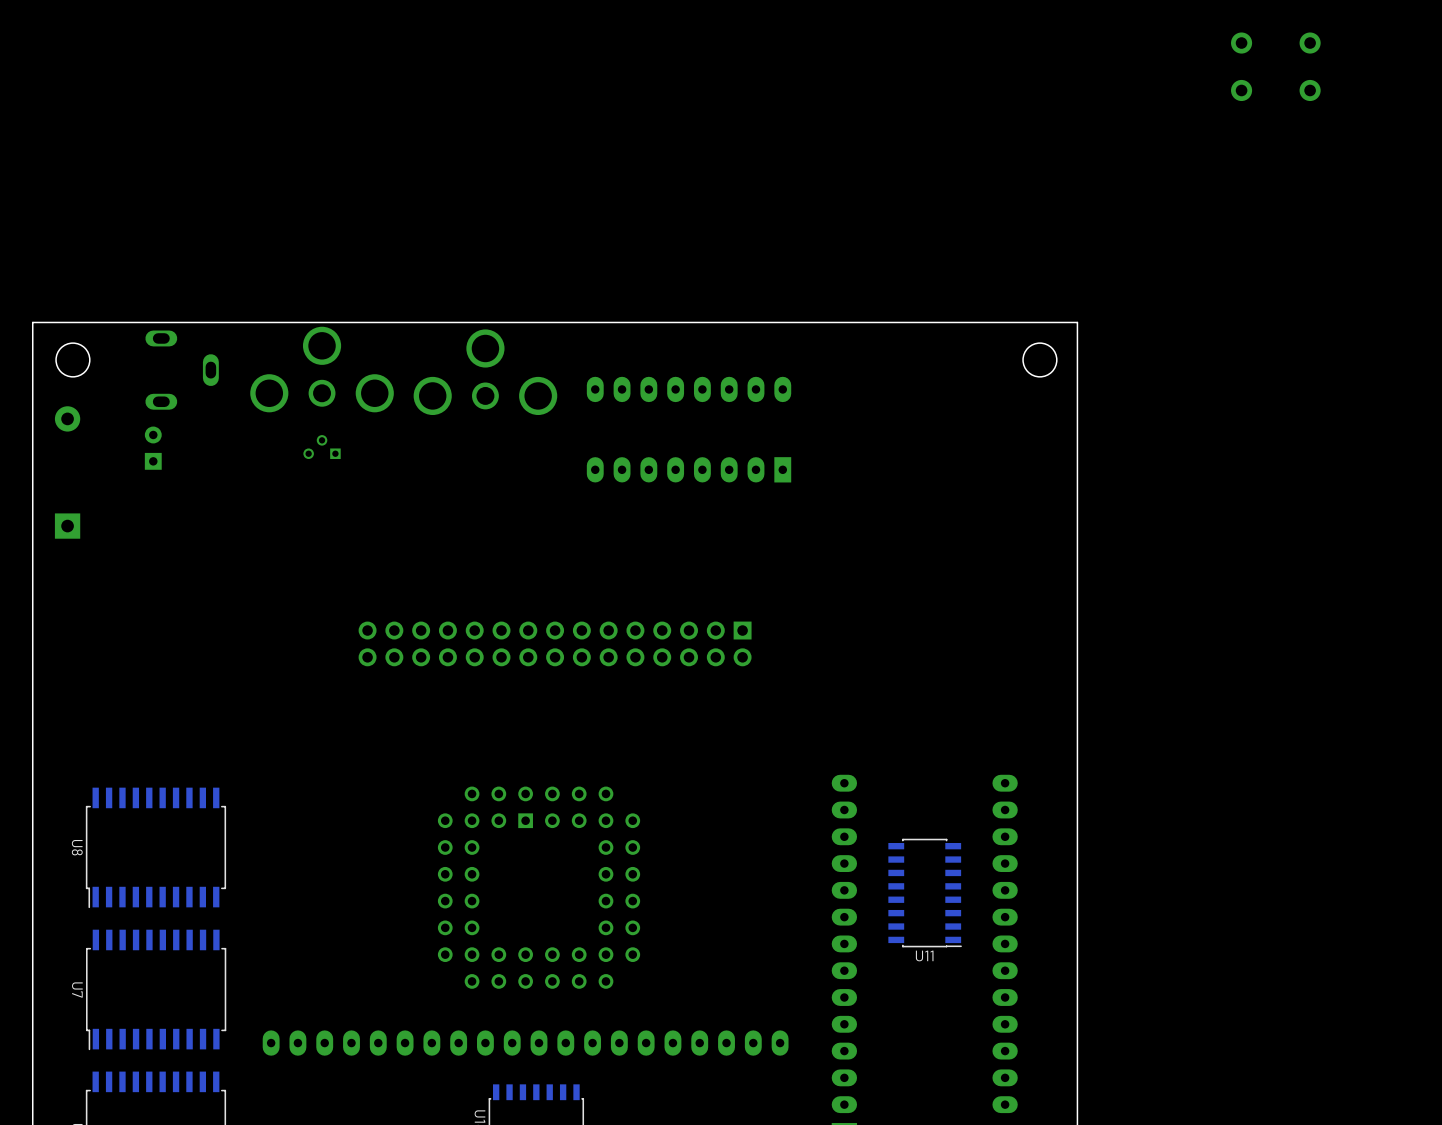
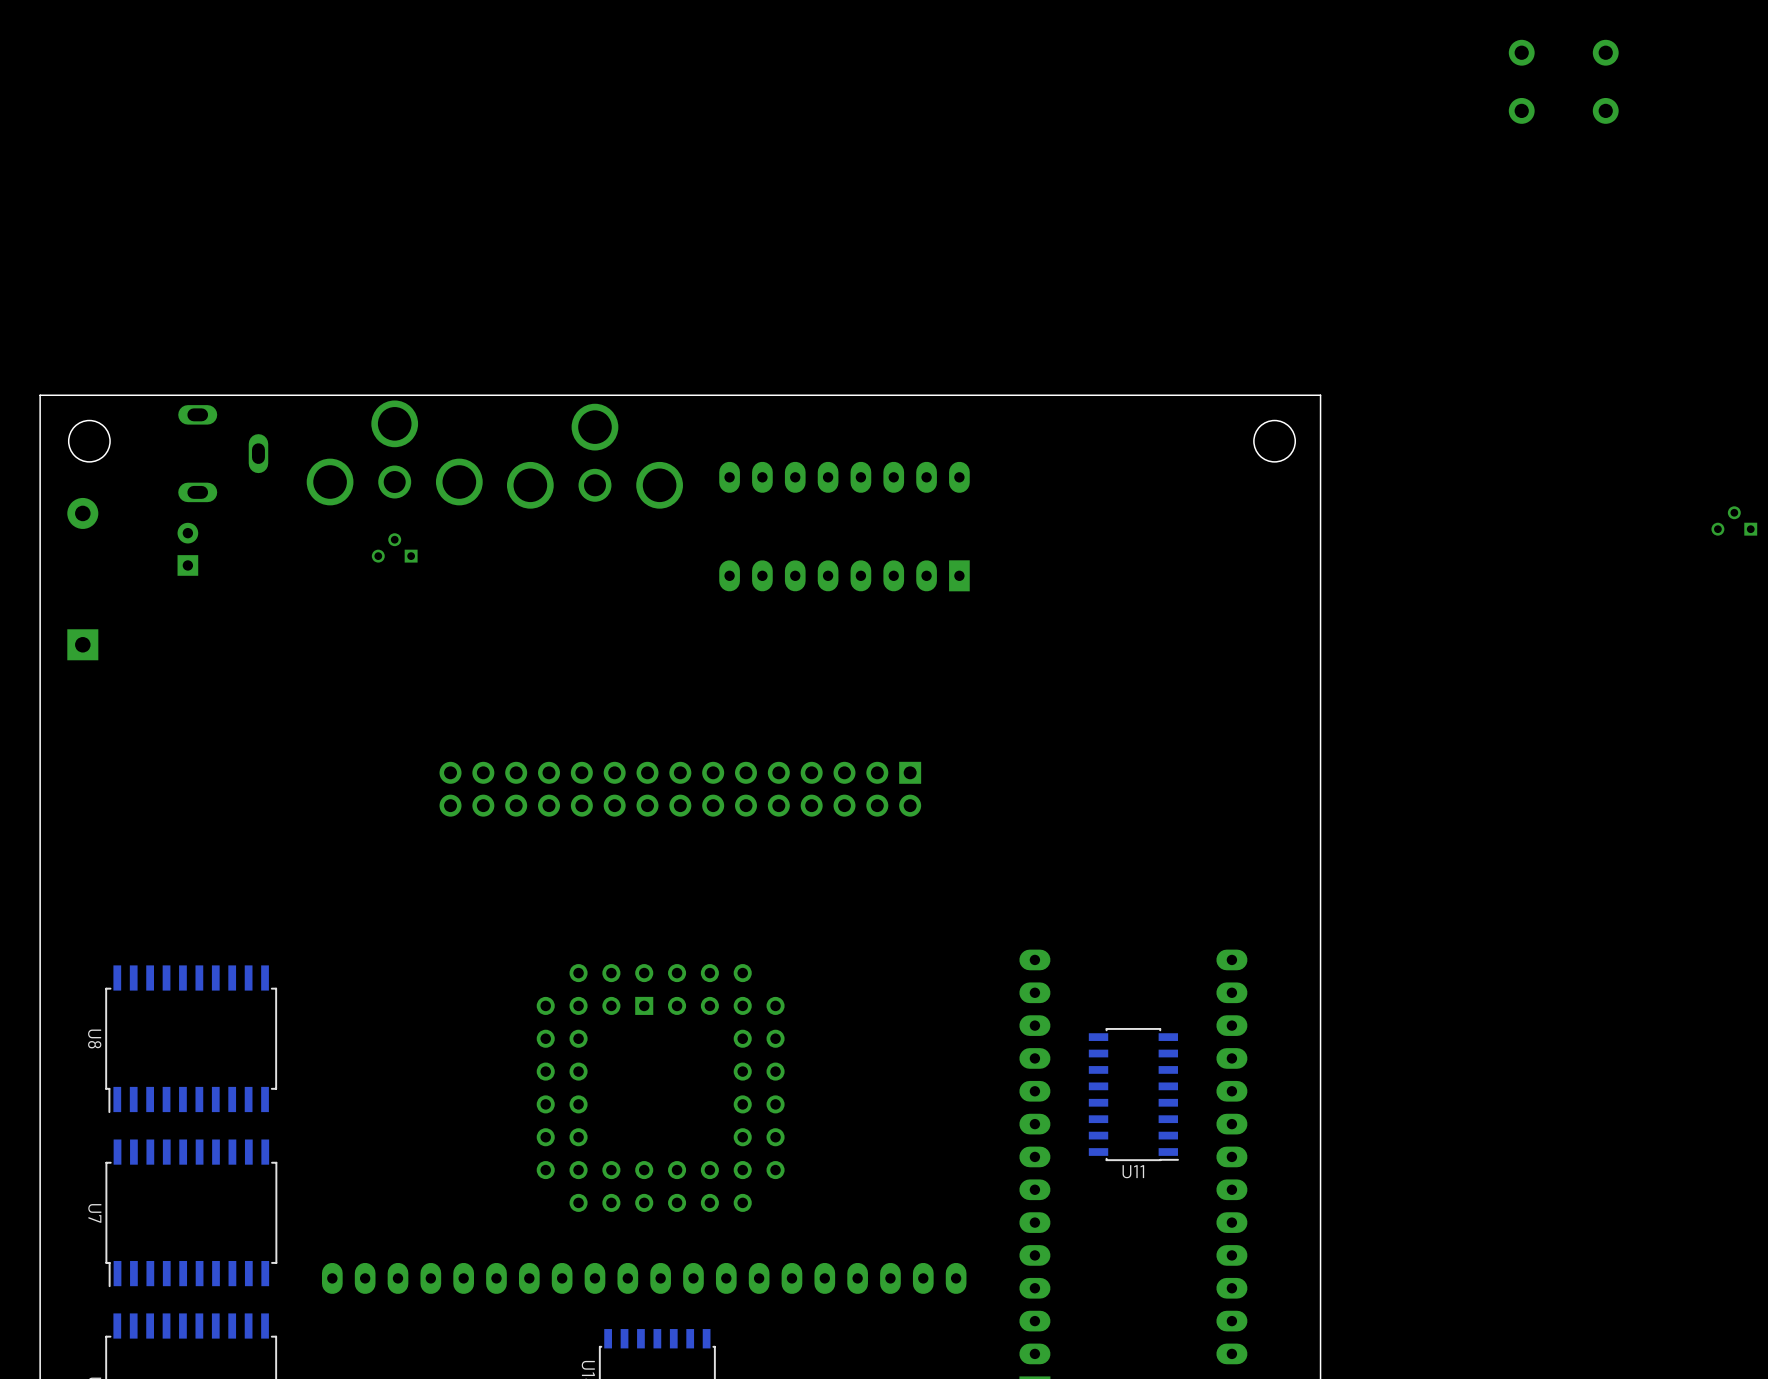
part: none -> (1734, 520)

